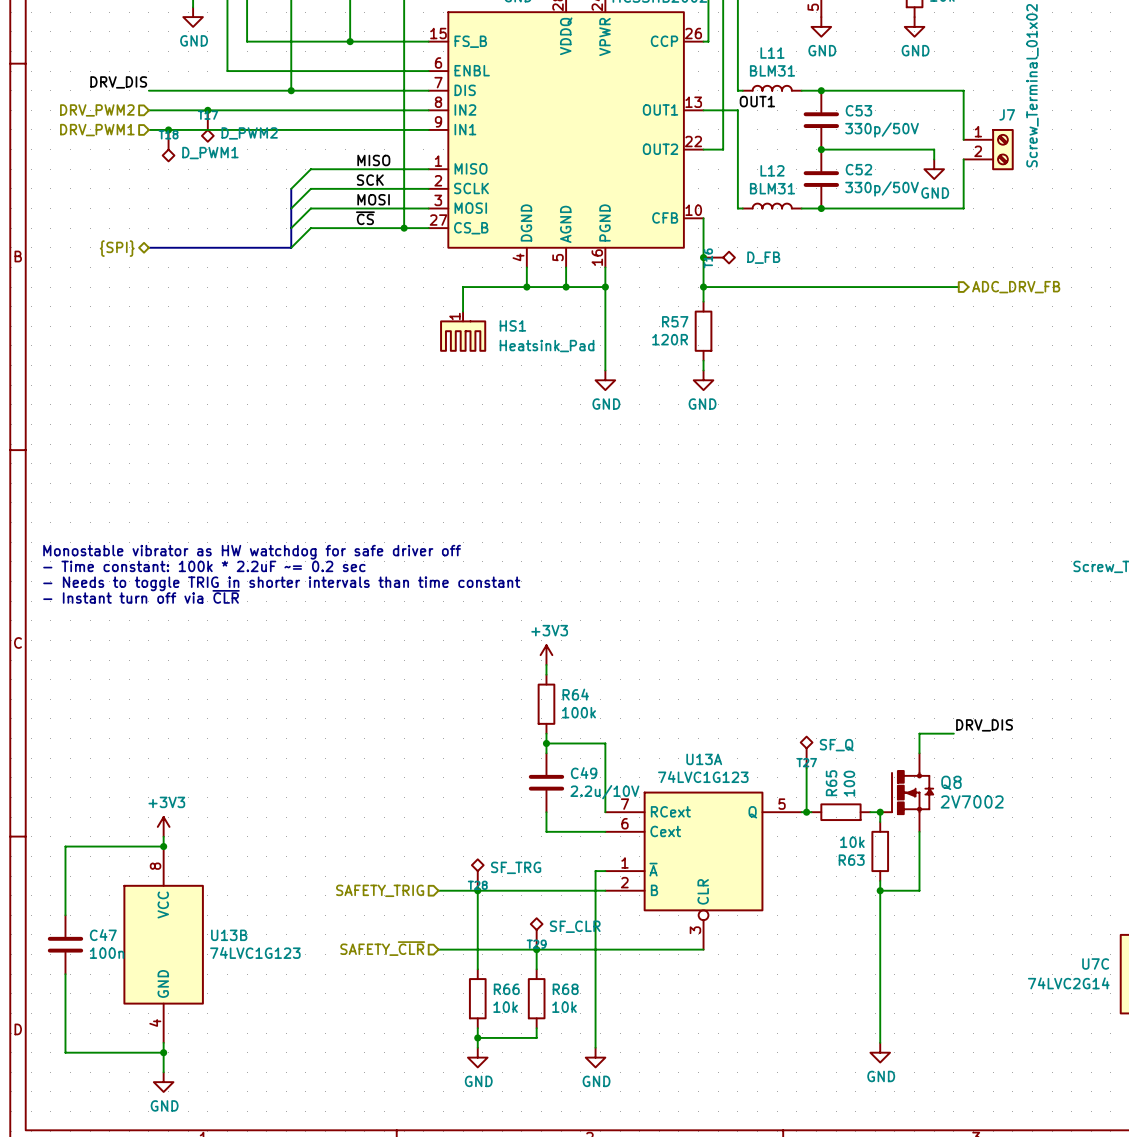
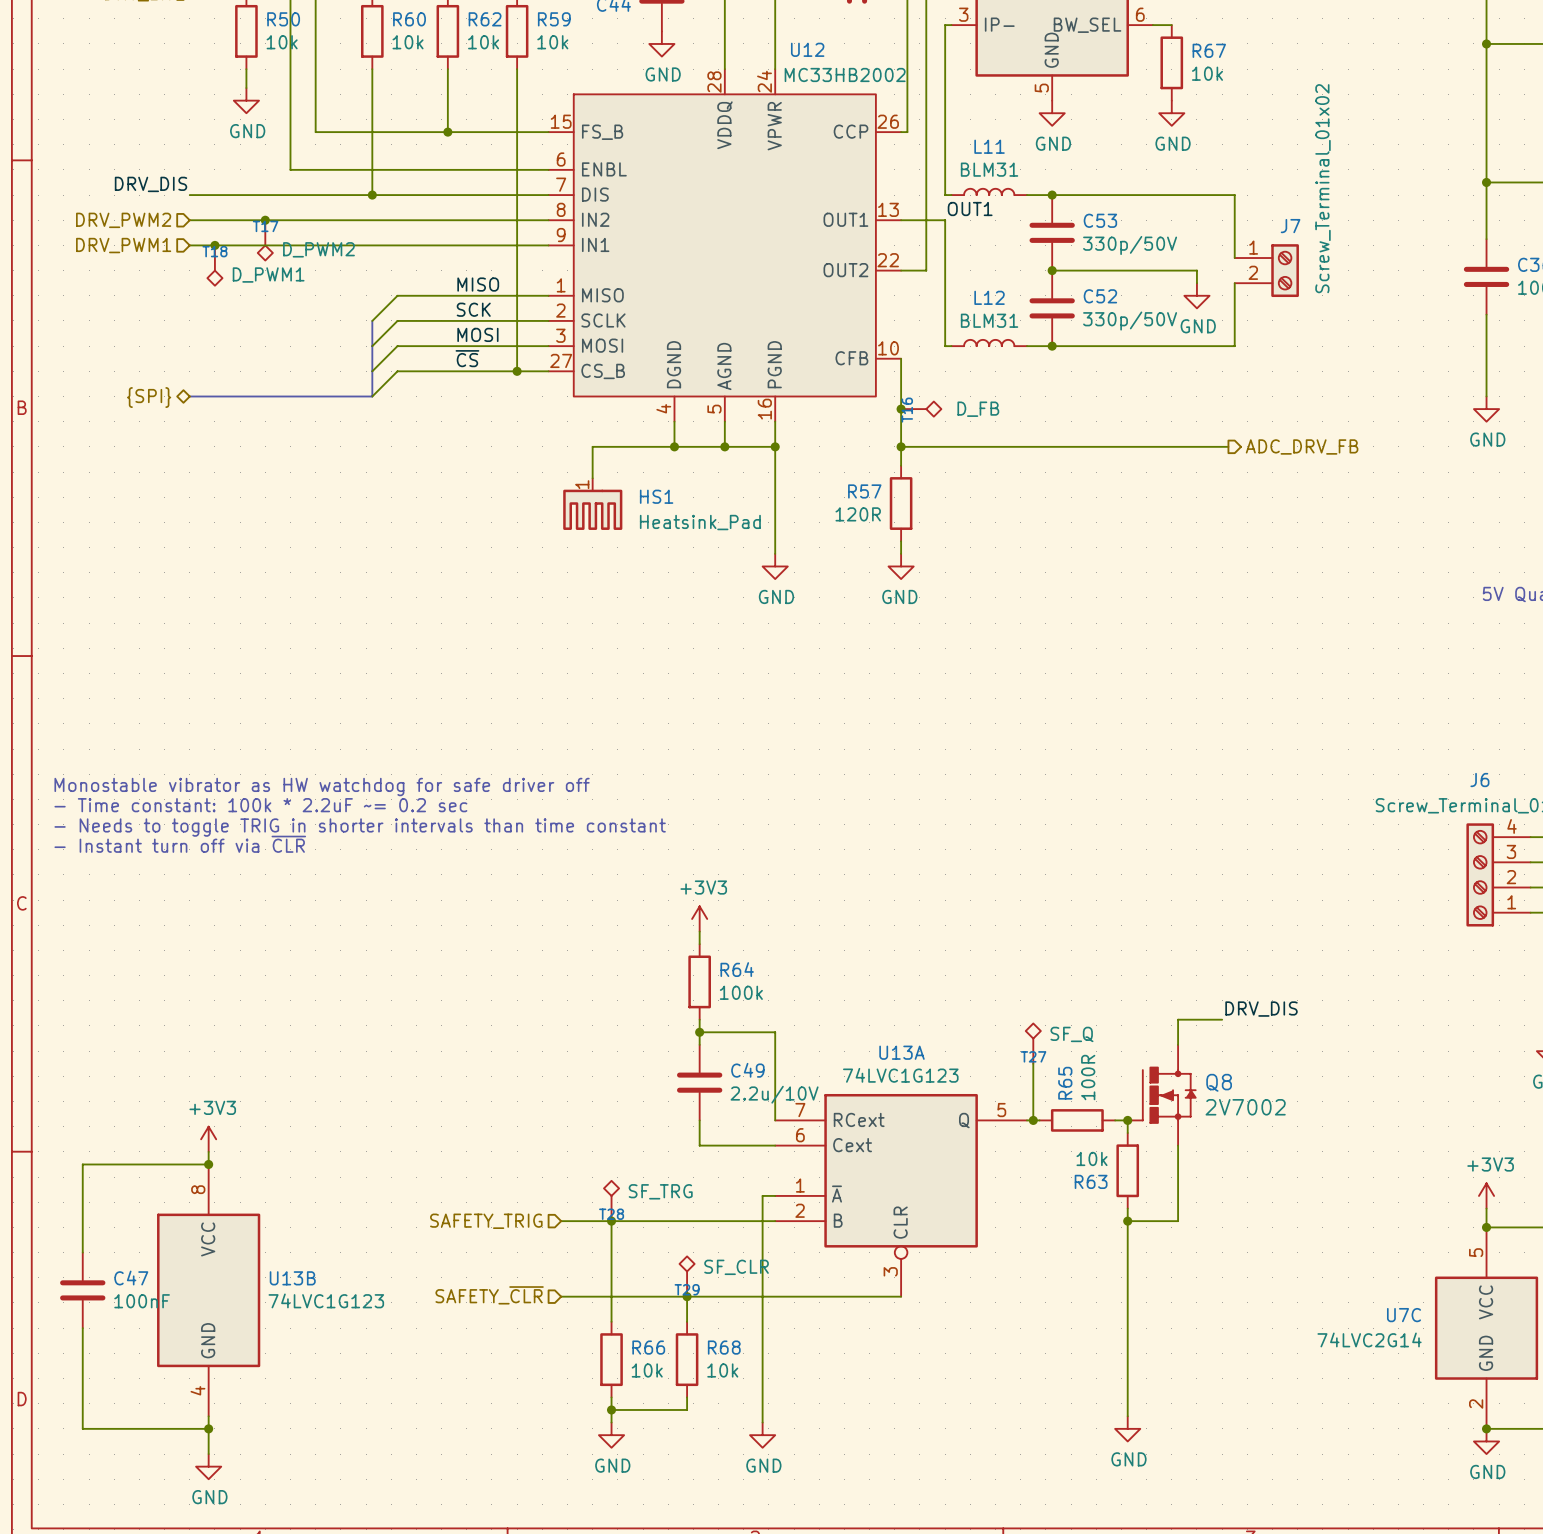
R65 value: 100 (849, 783) -> 100R (1088, 1077)
C47 value: 100n (107, 953) -> 100nF (142, 1301)

